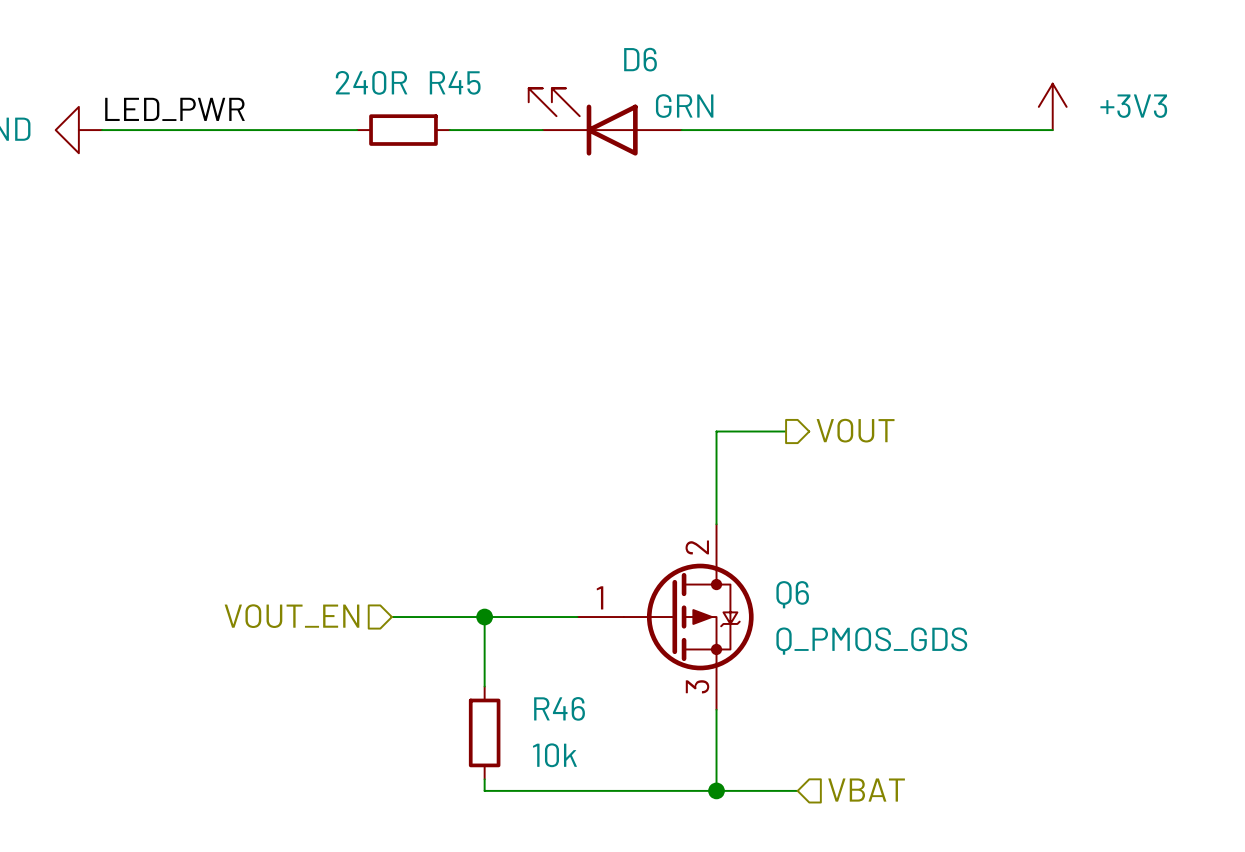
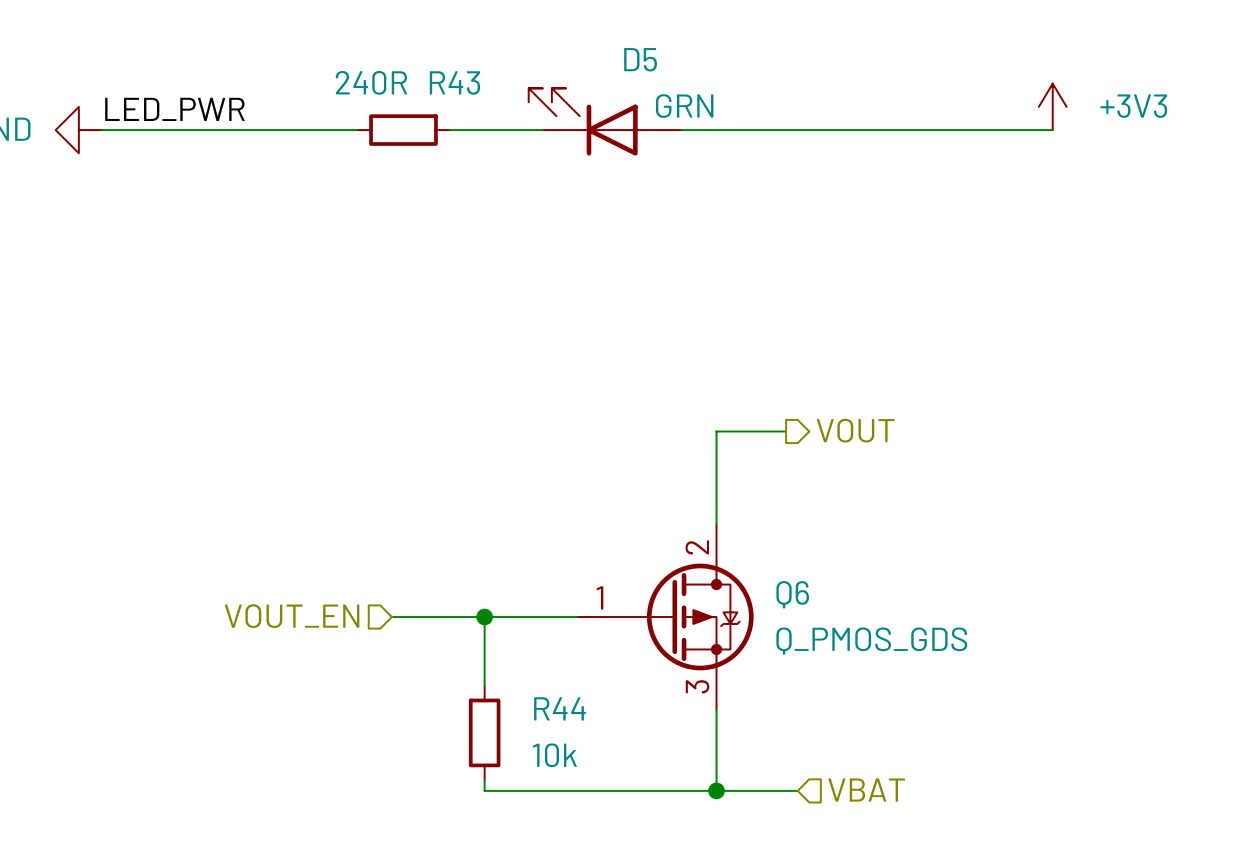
D6 name: D6 (640, 59) -> D5 (640, 59)
R45 name: R45 (455, 82) -> R43 (454, 82)
R46 name: R46 (559, 708) -> R44 (559, 708)

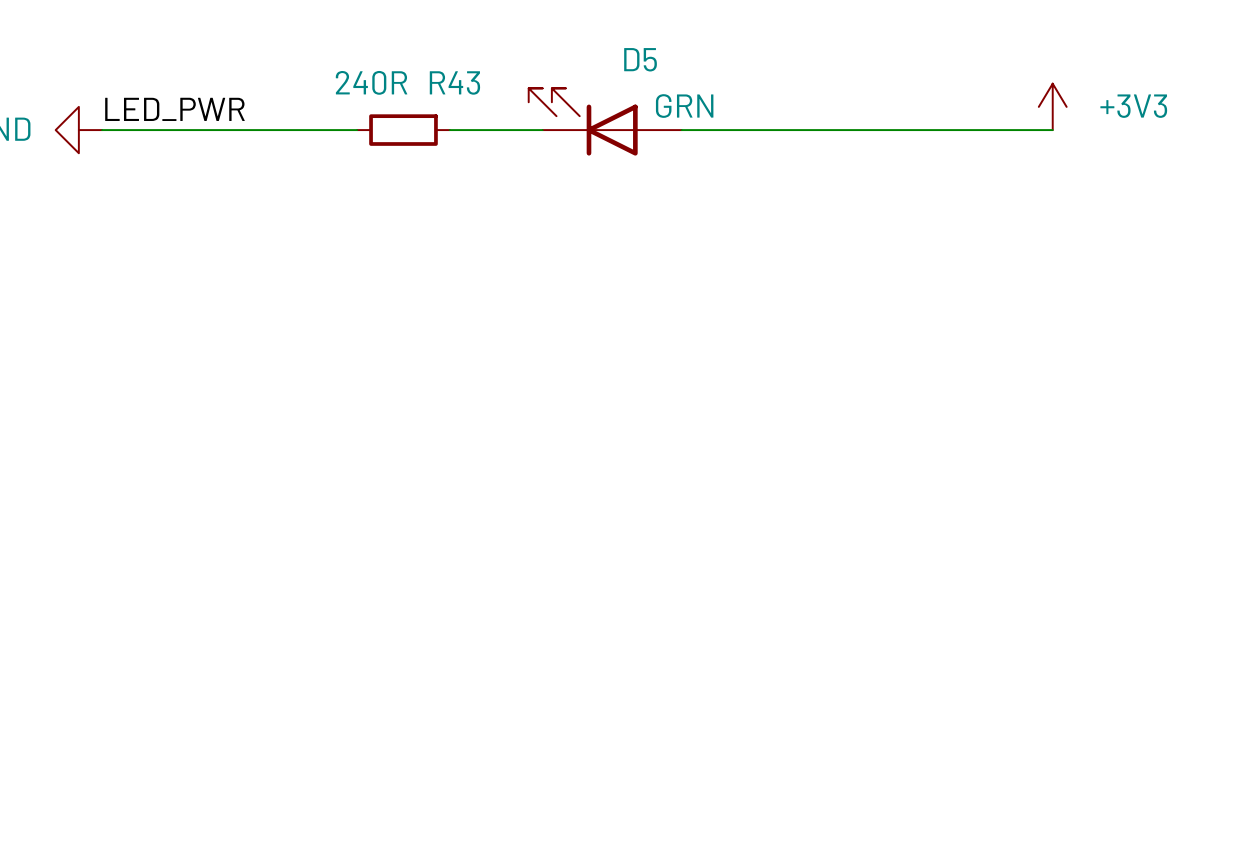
hierarchical label: VOUT (855, 430) -> none
wire: (786, 431) (716, 431) (716, 524) -> none
hierarchical label: VOUT_EN (292, 616) -> none
wire: (391, 617) (577, 617) -> none
wire: (484, 617) (484, 686) -> none
junction: (484, 617) -> none
Q6: Q_PMOS_GDS (665, 617) -> none
wire: (716, 709) (716, 790) -> none
R44: 10k (484, 732) -> none
wire: (484, 779) (484, 790) (797, 790) -> none
junction: (716, 790) -> none
hierarchical label: VBAT (866, 790) -> none

